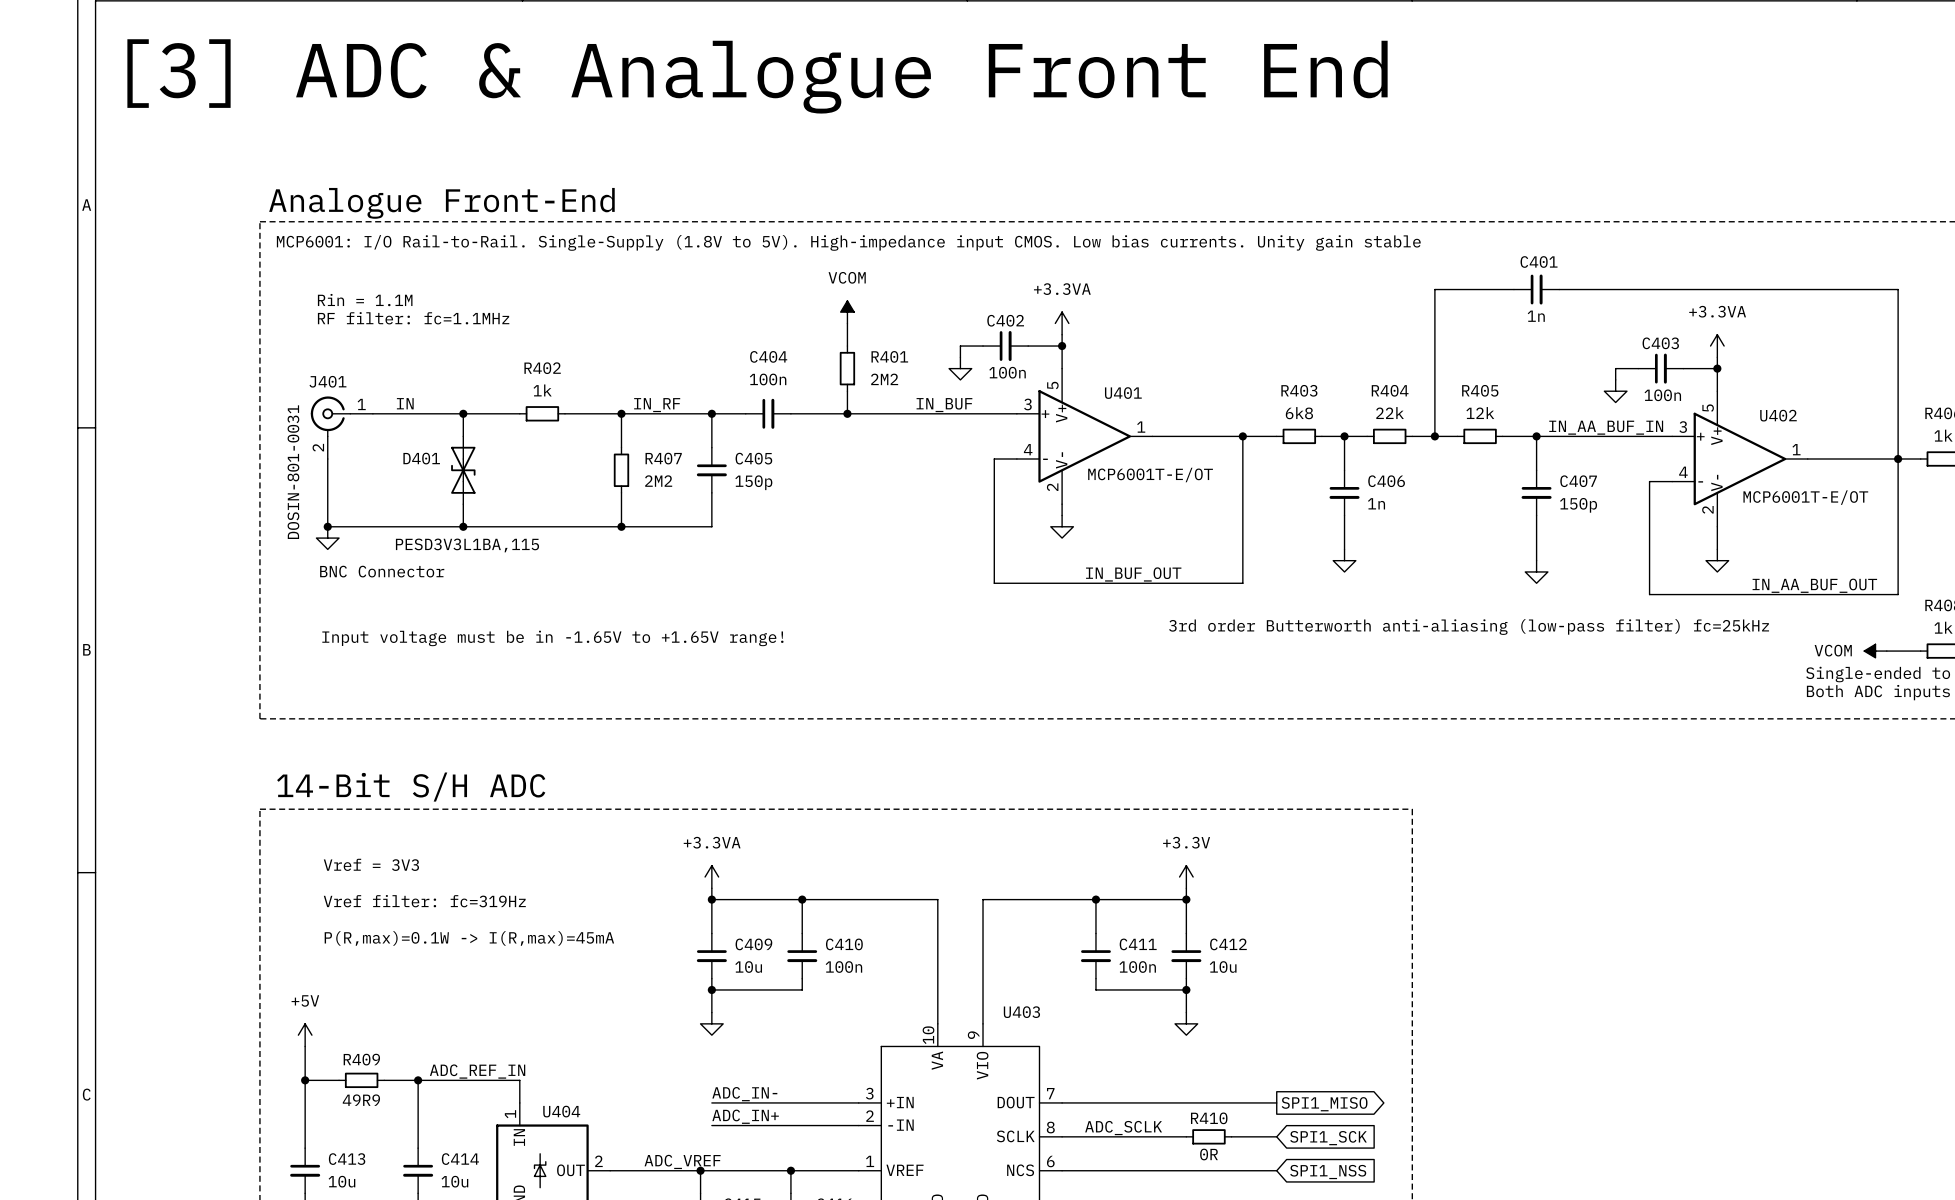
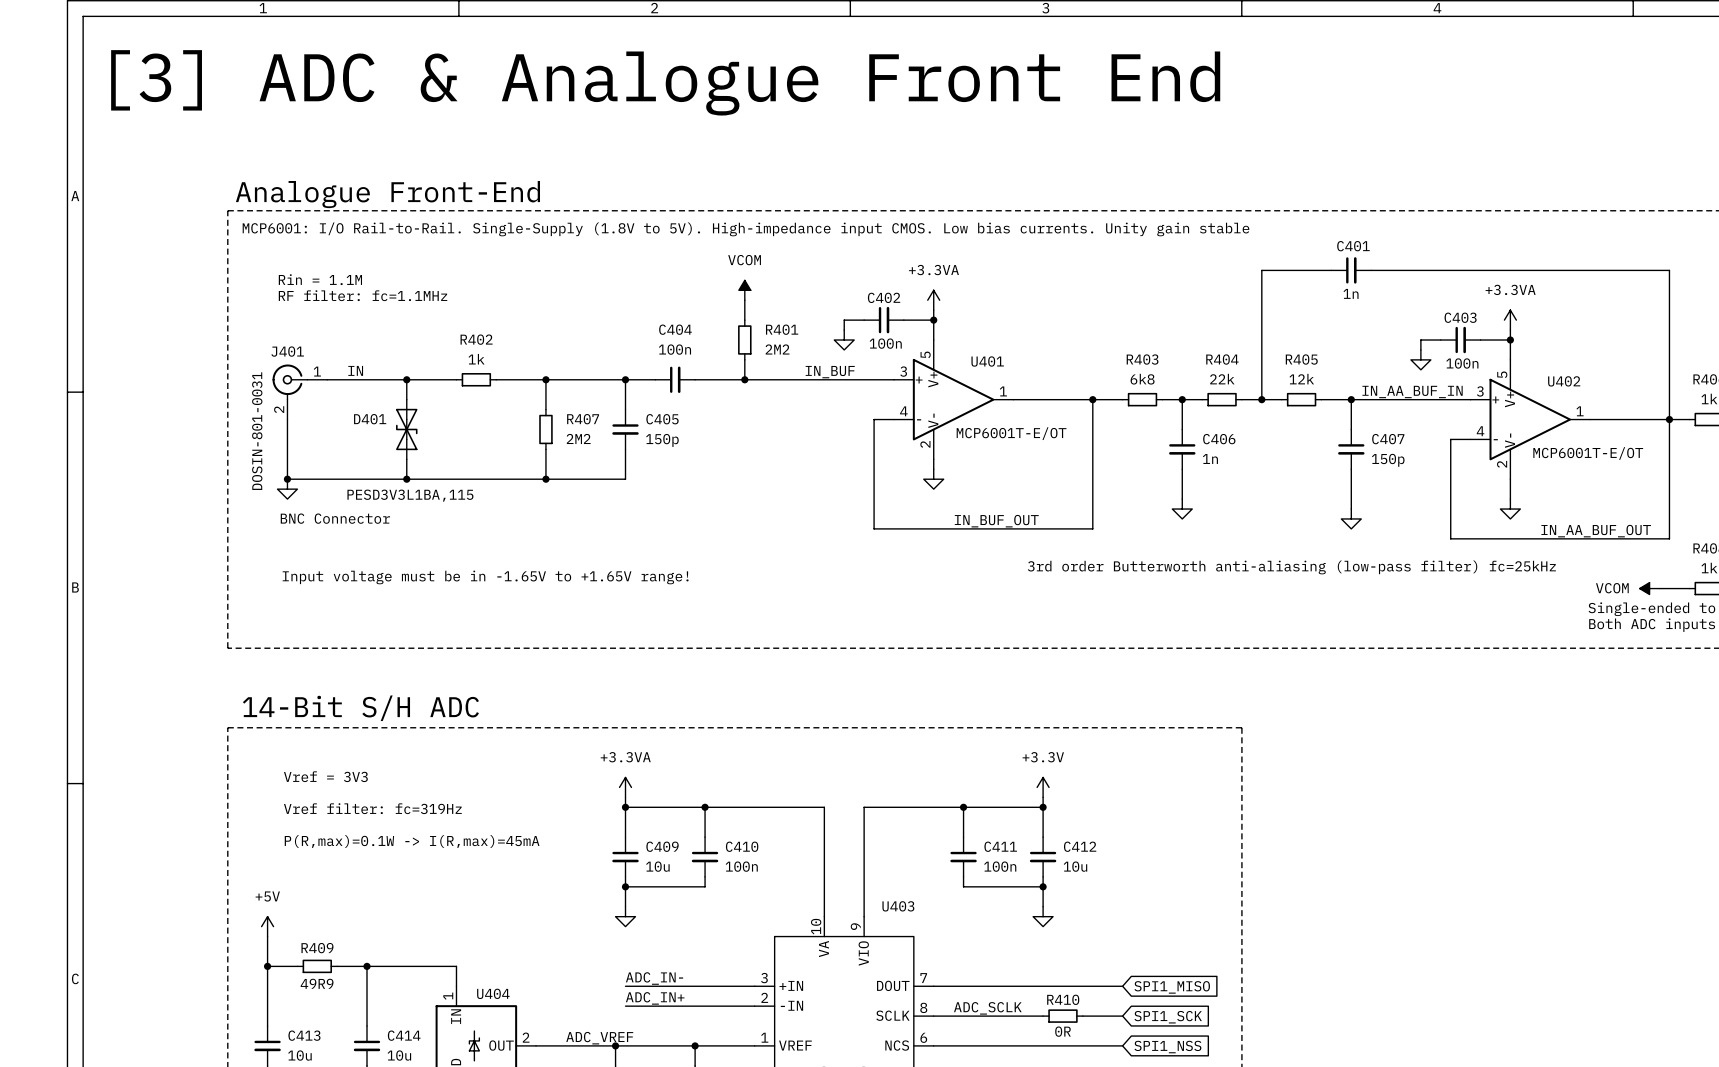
label: IN_RF (657, 405) -> none
label: ADC_REF_IN (477, 1071) -> none
global label shape: output (1324, 1104) -> input (1172, 987)

